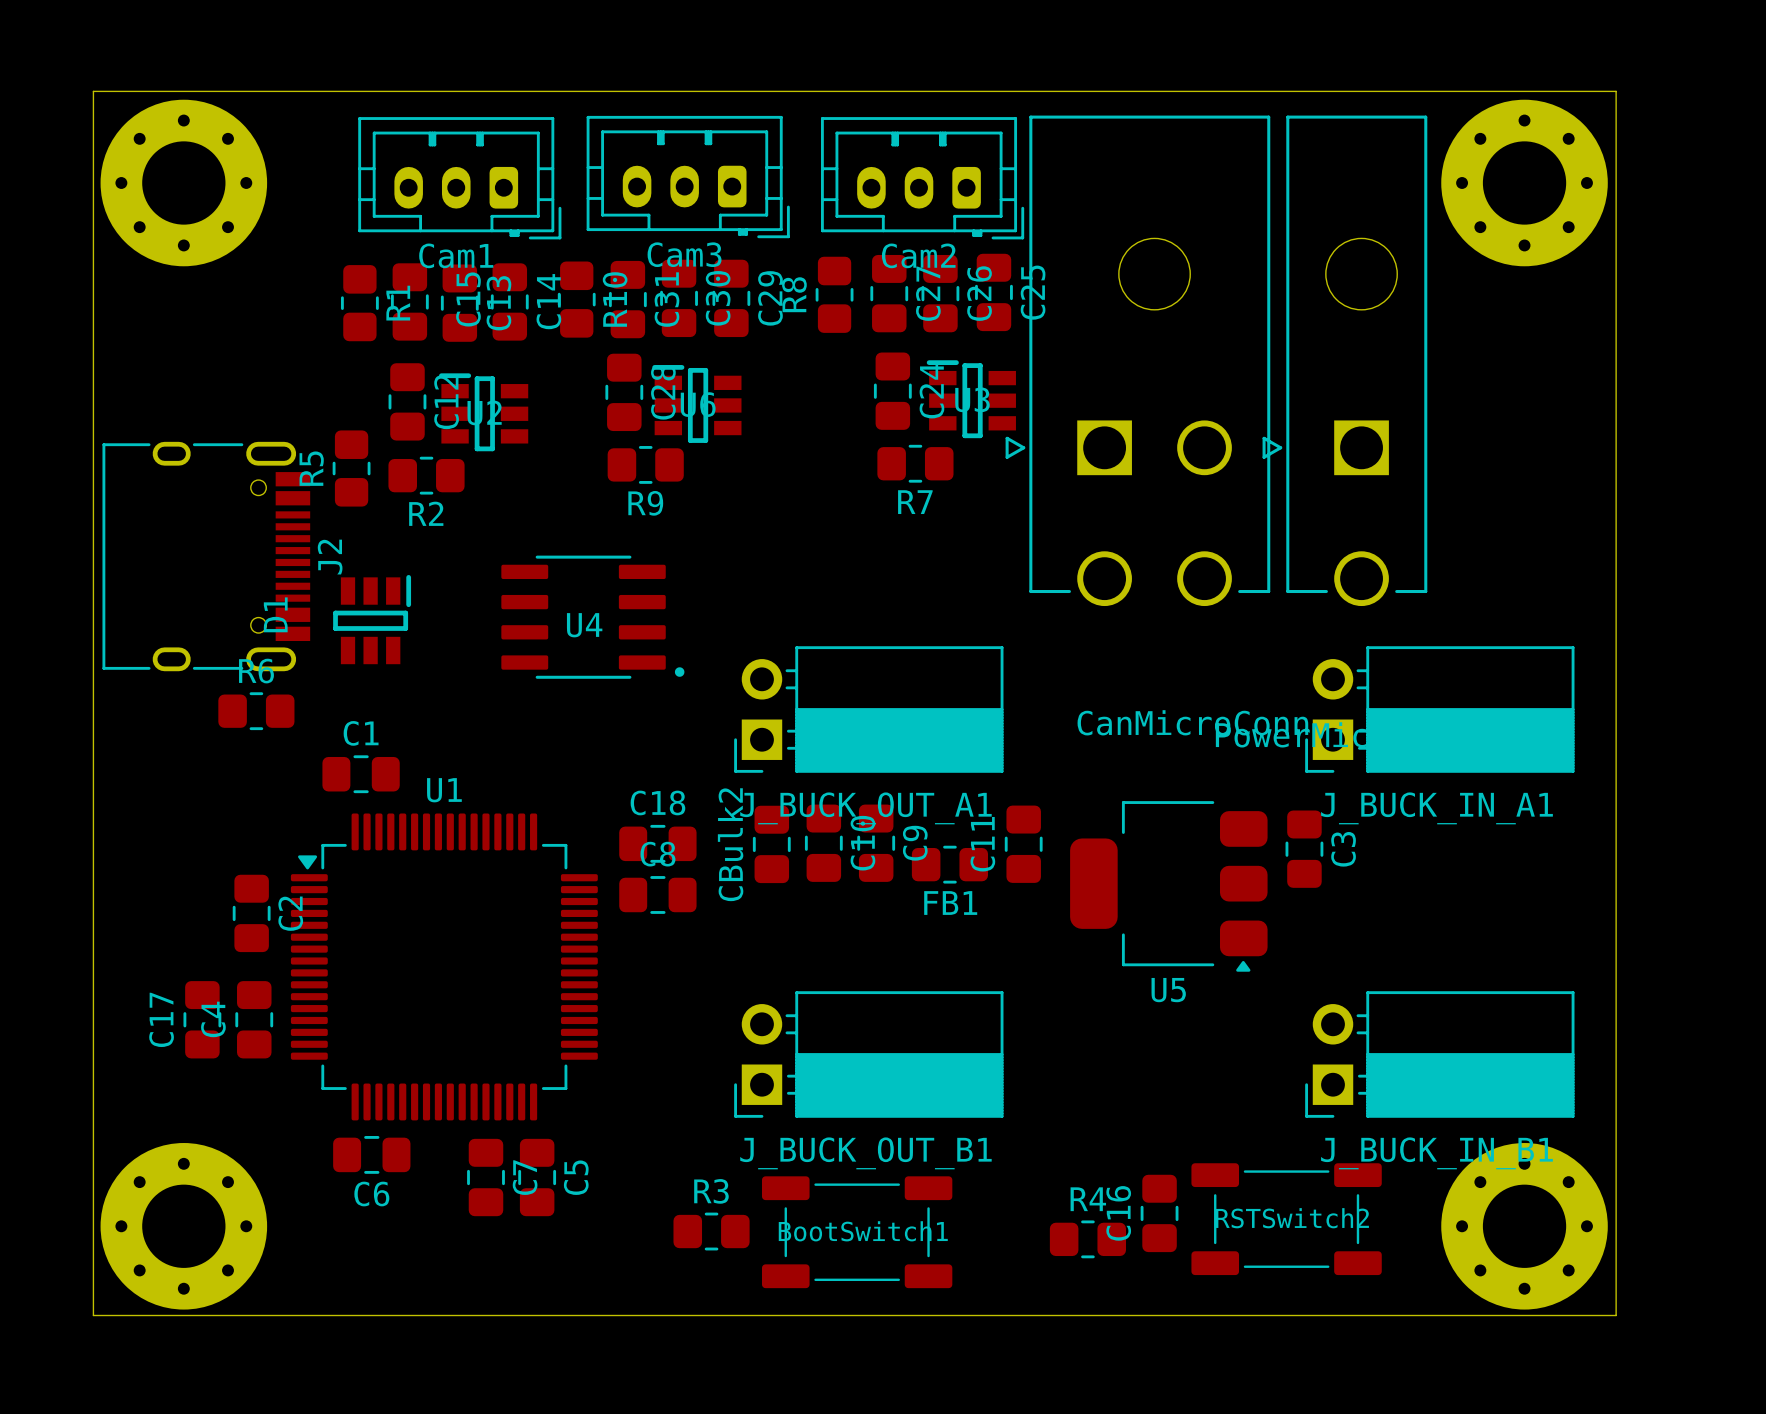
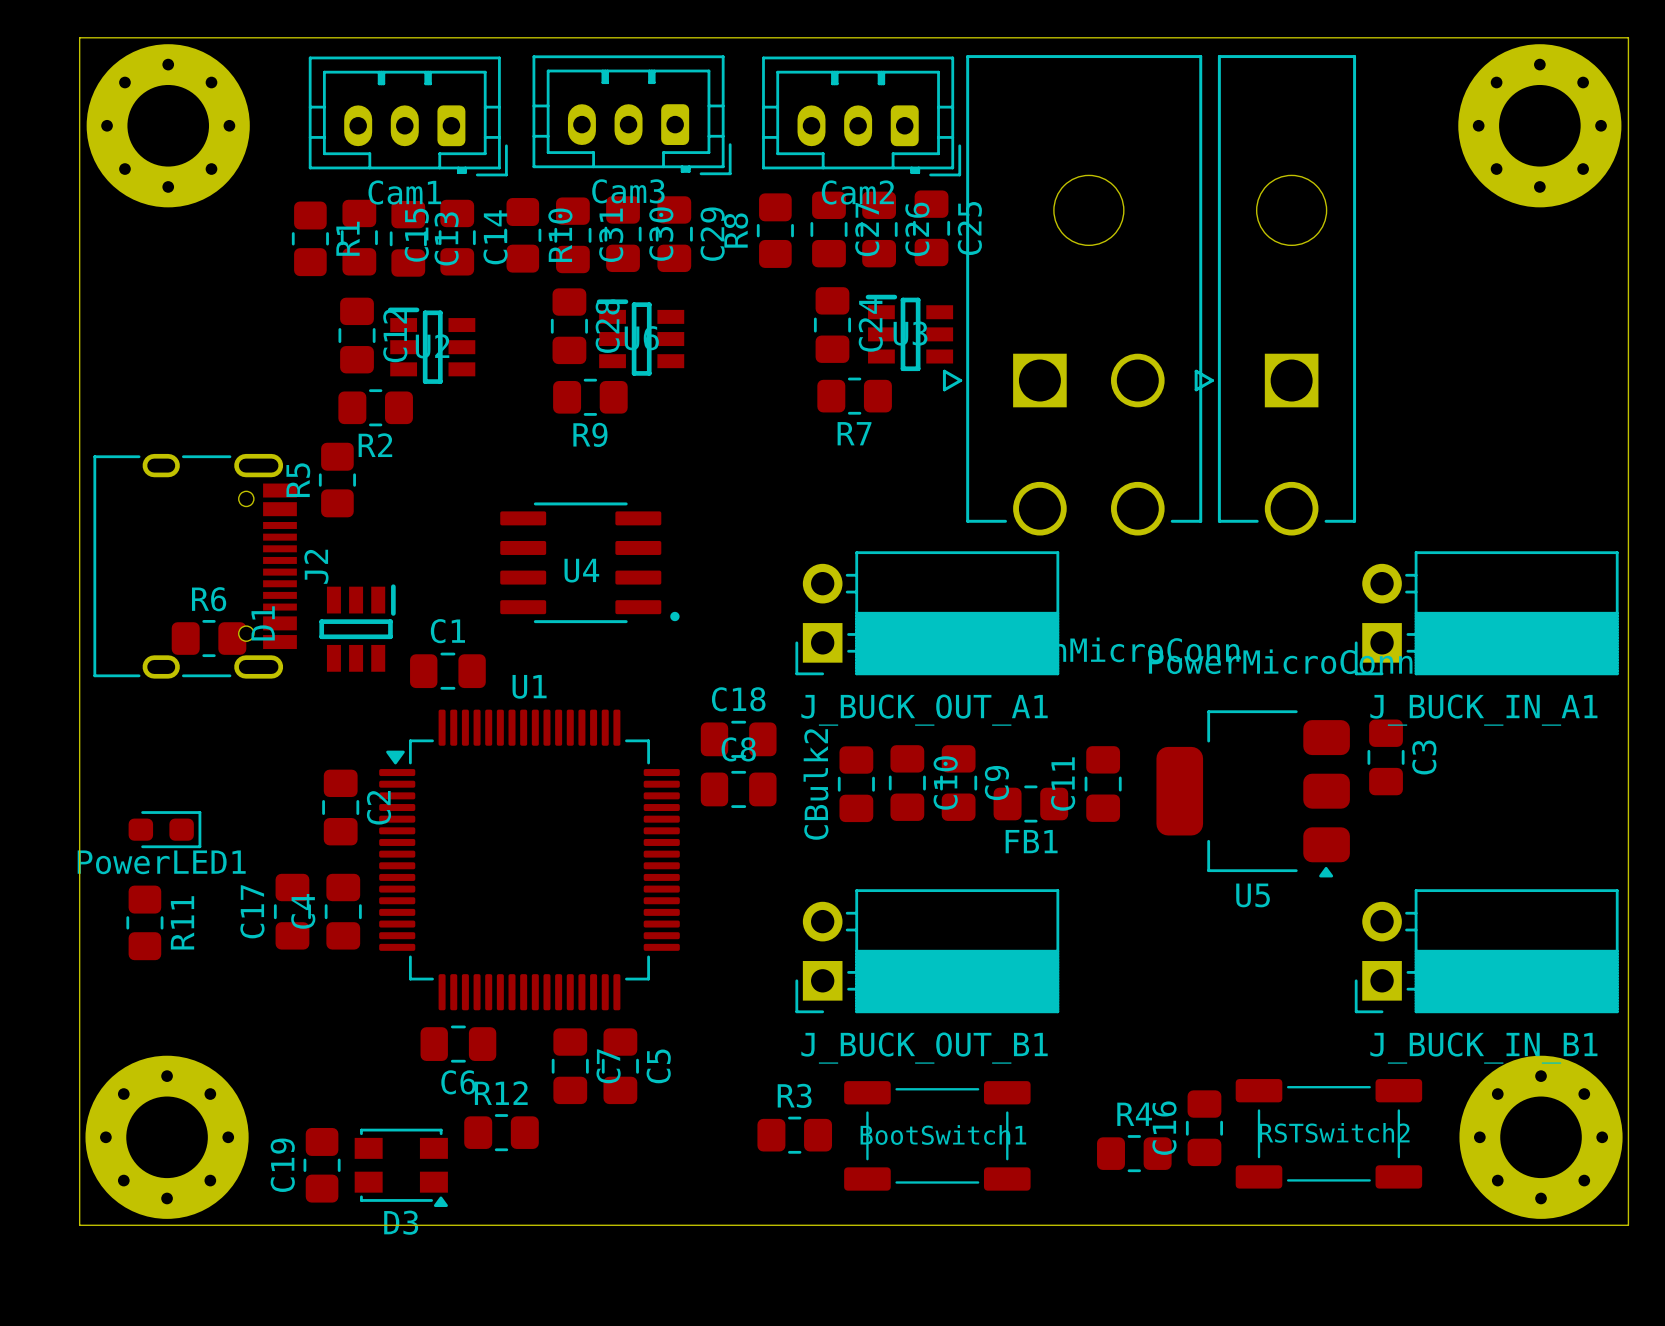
board edge: (93, 91) (1616, 91) (1616, 1315) (93, 1315) (93, 91) -> (79, 37) (79, 1225) (1628, 1225) (1628, 37) (79, 37)
part position: (183, 182) -> (168, 125)
part position: (1524, 182) -> (1539, 125)
R5 position: (351, 468) -> (337, 480)
J2 position: (206, 556) -> (195, 566)
U4 position: (592, 617) -> (589, 562)
D1 position: (372, 619) -> (357, 628)
J_BUCK_OUT_A1 position: (868, 709) -> (927, 613)
J_BUCK_IN_A1 position: (1439, 709) -> (1486, 613)
C1 position: (361, 774) -> (447, 671)
C18 position: (657, 843) -> (738, 739)
C10 position: (823, 843) -> (907, 783)
C9 position: (876, 843) -> (958, 783)
CBulk2 position: (771, 844) -> (856, 784)
C11 position: (1023, 844) -> (1103, 784)
C3 position: (1304, 849) -> (1386, 757)
FB1 position: (949, 864) -> (1030, 804)
U5 position: (1168, 886) -> (1253, 793)
C8 position: (657, 894) -> (738, 789)
PowerLED1: none -> (164, 829)
C2 position: (251, 913) -> (340, 807)
U1 position: (444, 966) -> (529, 859)
R11: none -> (144, 922)
C17 position: (202, 1019) -> (292, 911)
C4 position: (254, 1019) -> (343, 911)
J_BUCK_OUT_B1 position: (868, 1054) -> (927, 951)
J_BUCK_IN_B1 position: (1439, 1054) -> (1486, 951)
C6 position: (371, 1154) -> (458, 1044)
C7 position: (485, 1177) -> (570, 1066)
C5 position: (537, 1177) -> (620, 1066)
C16 position: (1159, 1213) -> (1204, 1128)
R12: none -> (501, 1132)
RSTSwitch2 position: (1286, 1219) -> (1328, 1133)
part position: (183, 1226) -> (167, 1137)
part position: (1524, 1226) -> (1541, 1137)
R3 position: (711, 1231) -> (794, 1135)
BootSwitch1 position: (857, 1232) -> (937, 1135)
R4 position: (1087, 1239) -> (1134, 1153)
C19: none -> (322, 1165)
D3: none -> (401, 1167)

